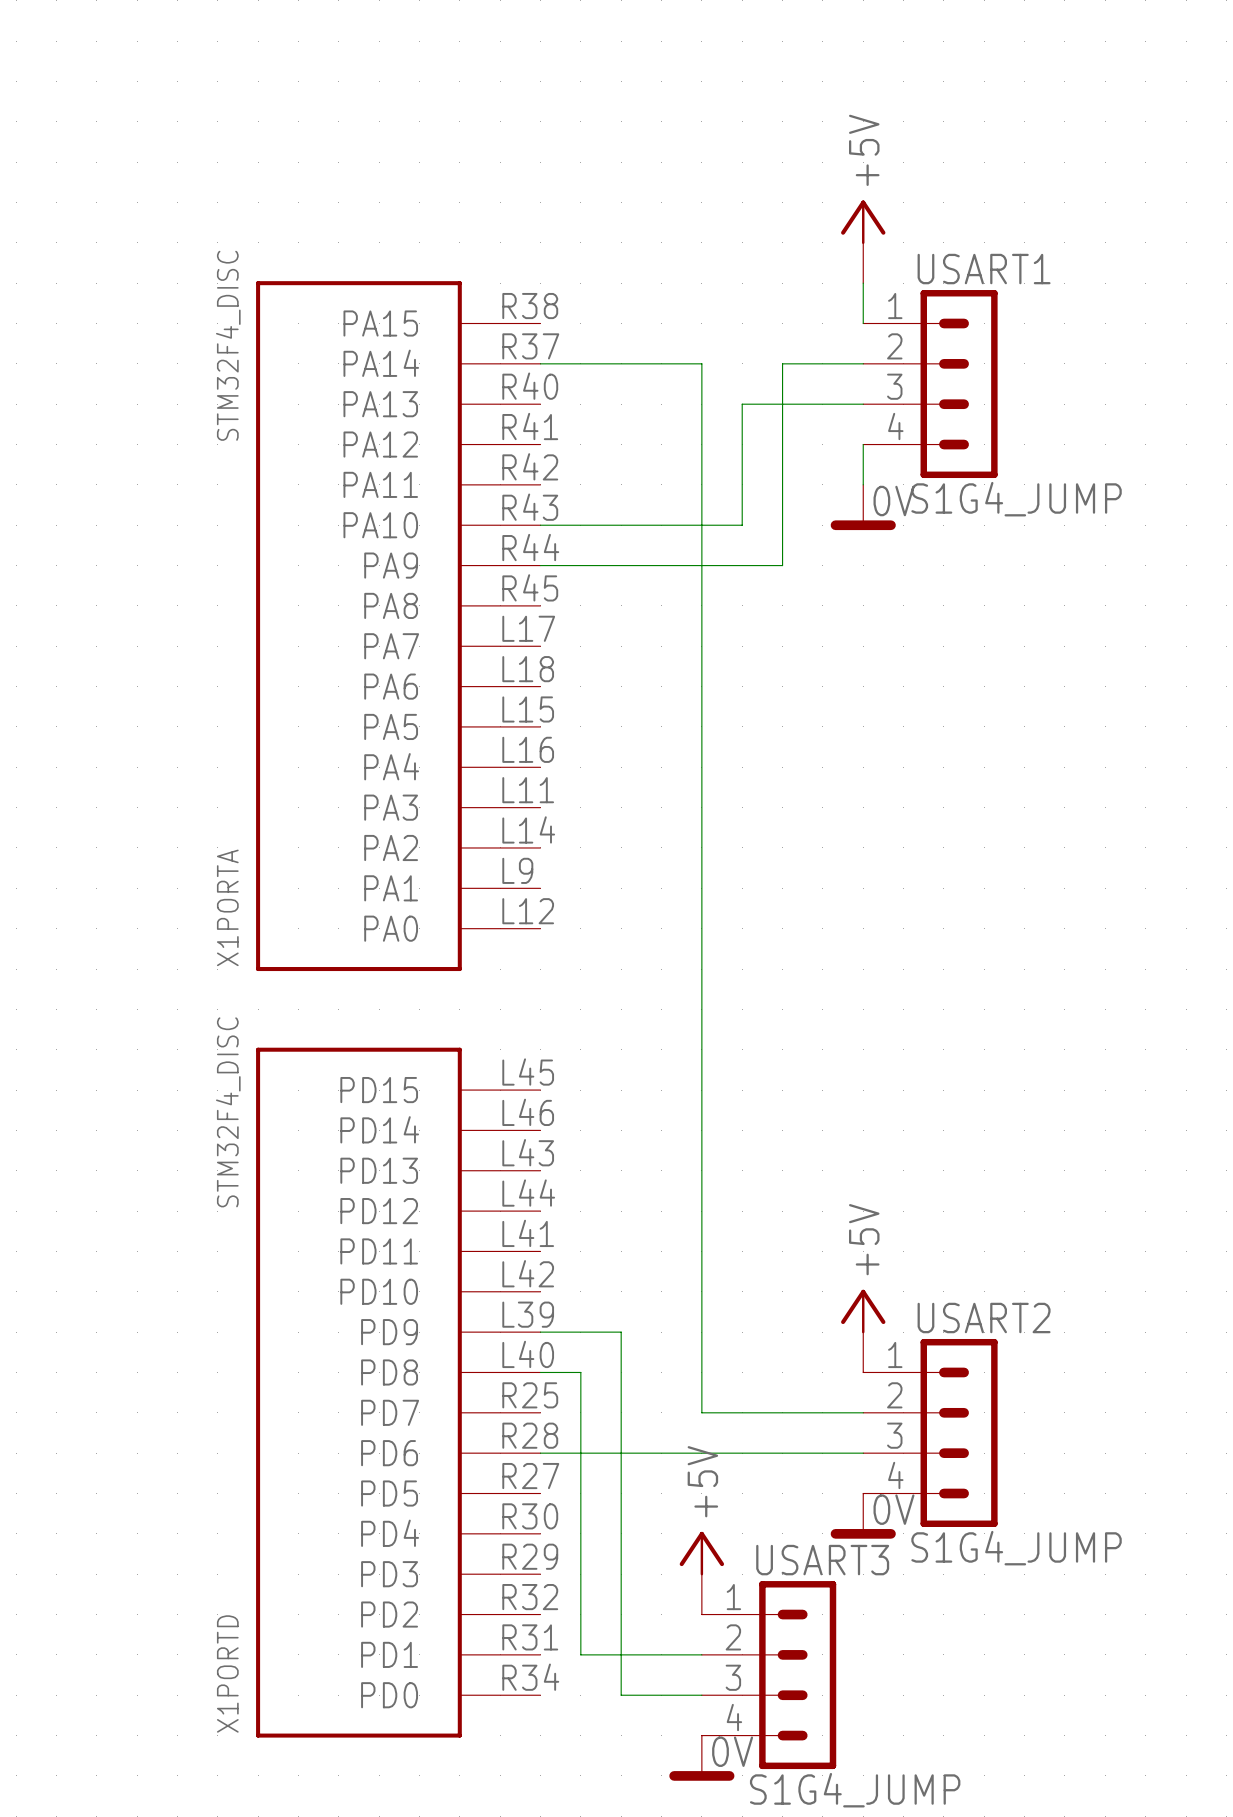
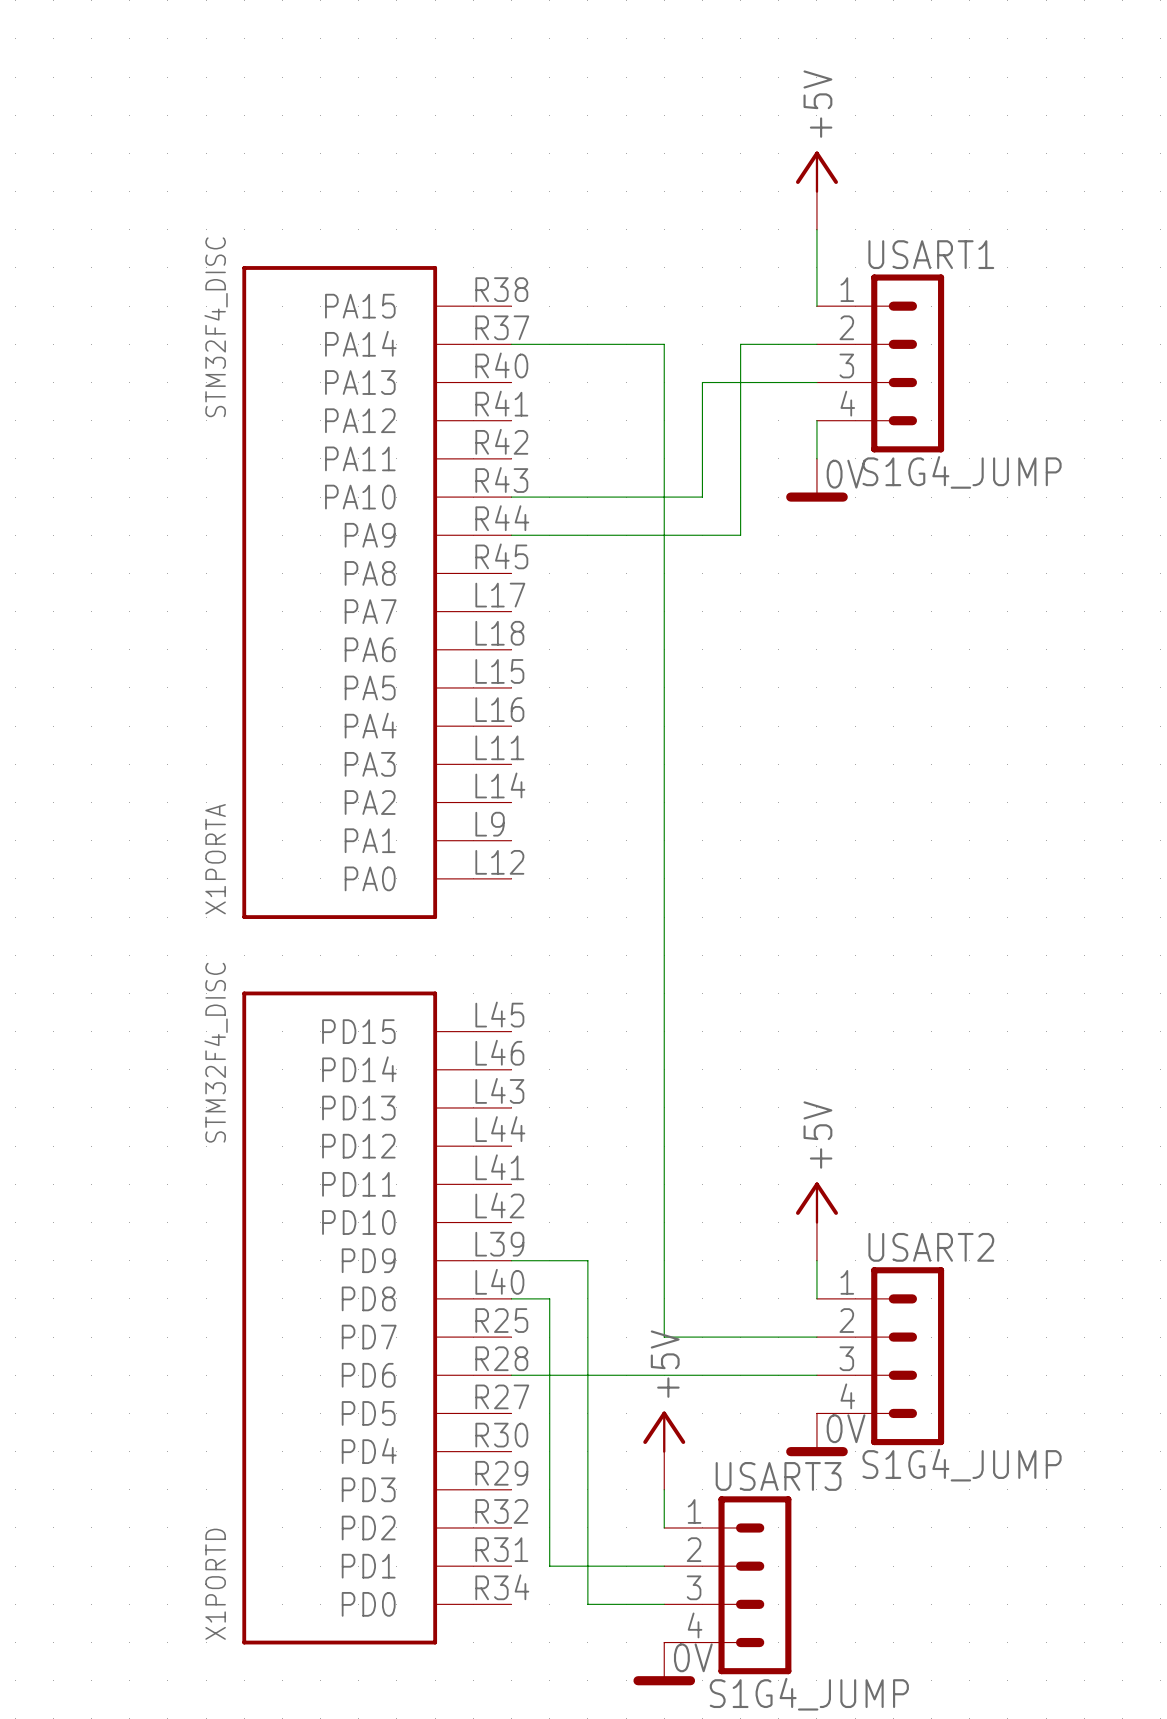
power symbol position: +5V (863, 241) -> +5V (816, 190)
power symbol position: +5V (863, 1331) -> +5V (816, 1221)
power symbol position: +5V (701, 1573) -> +5V (664, 1450)

